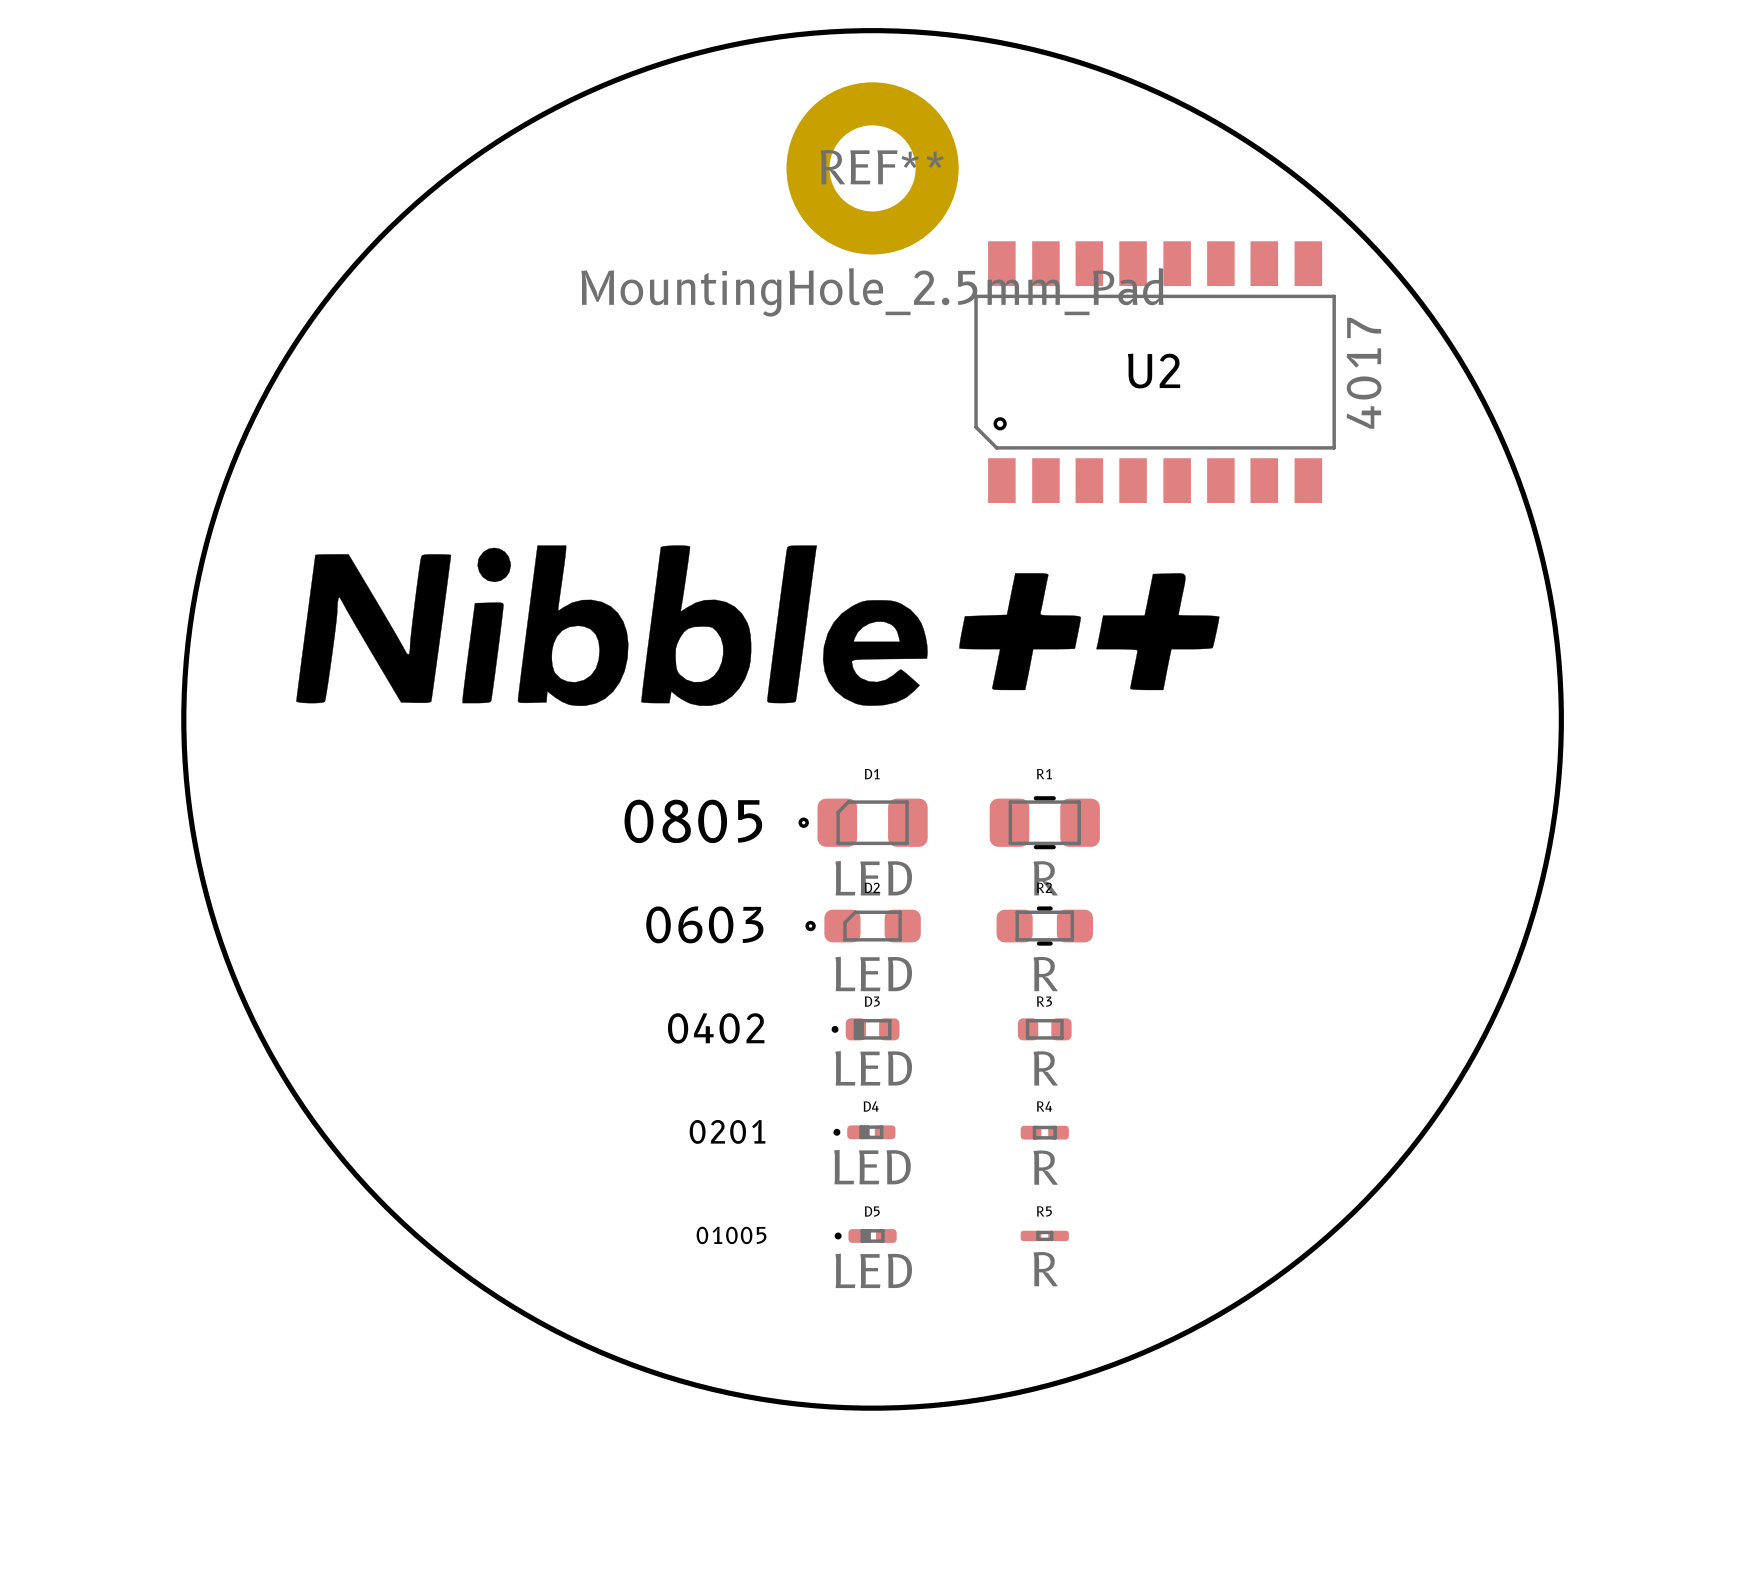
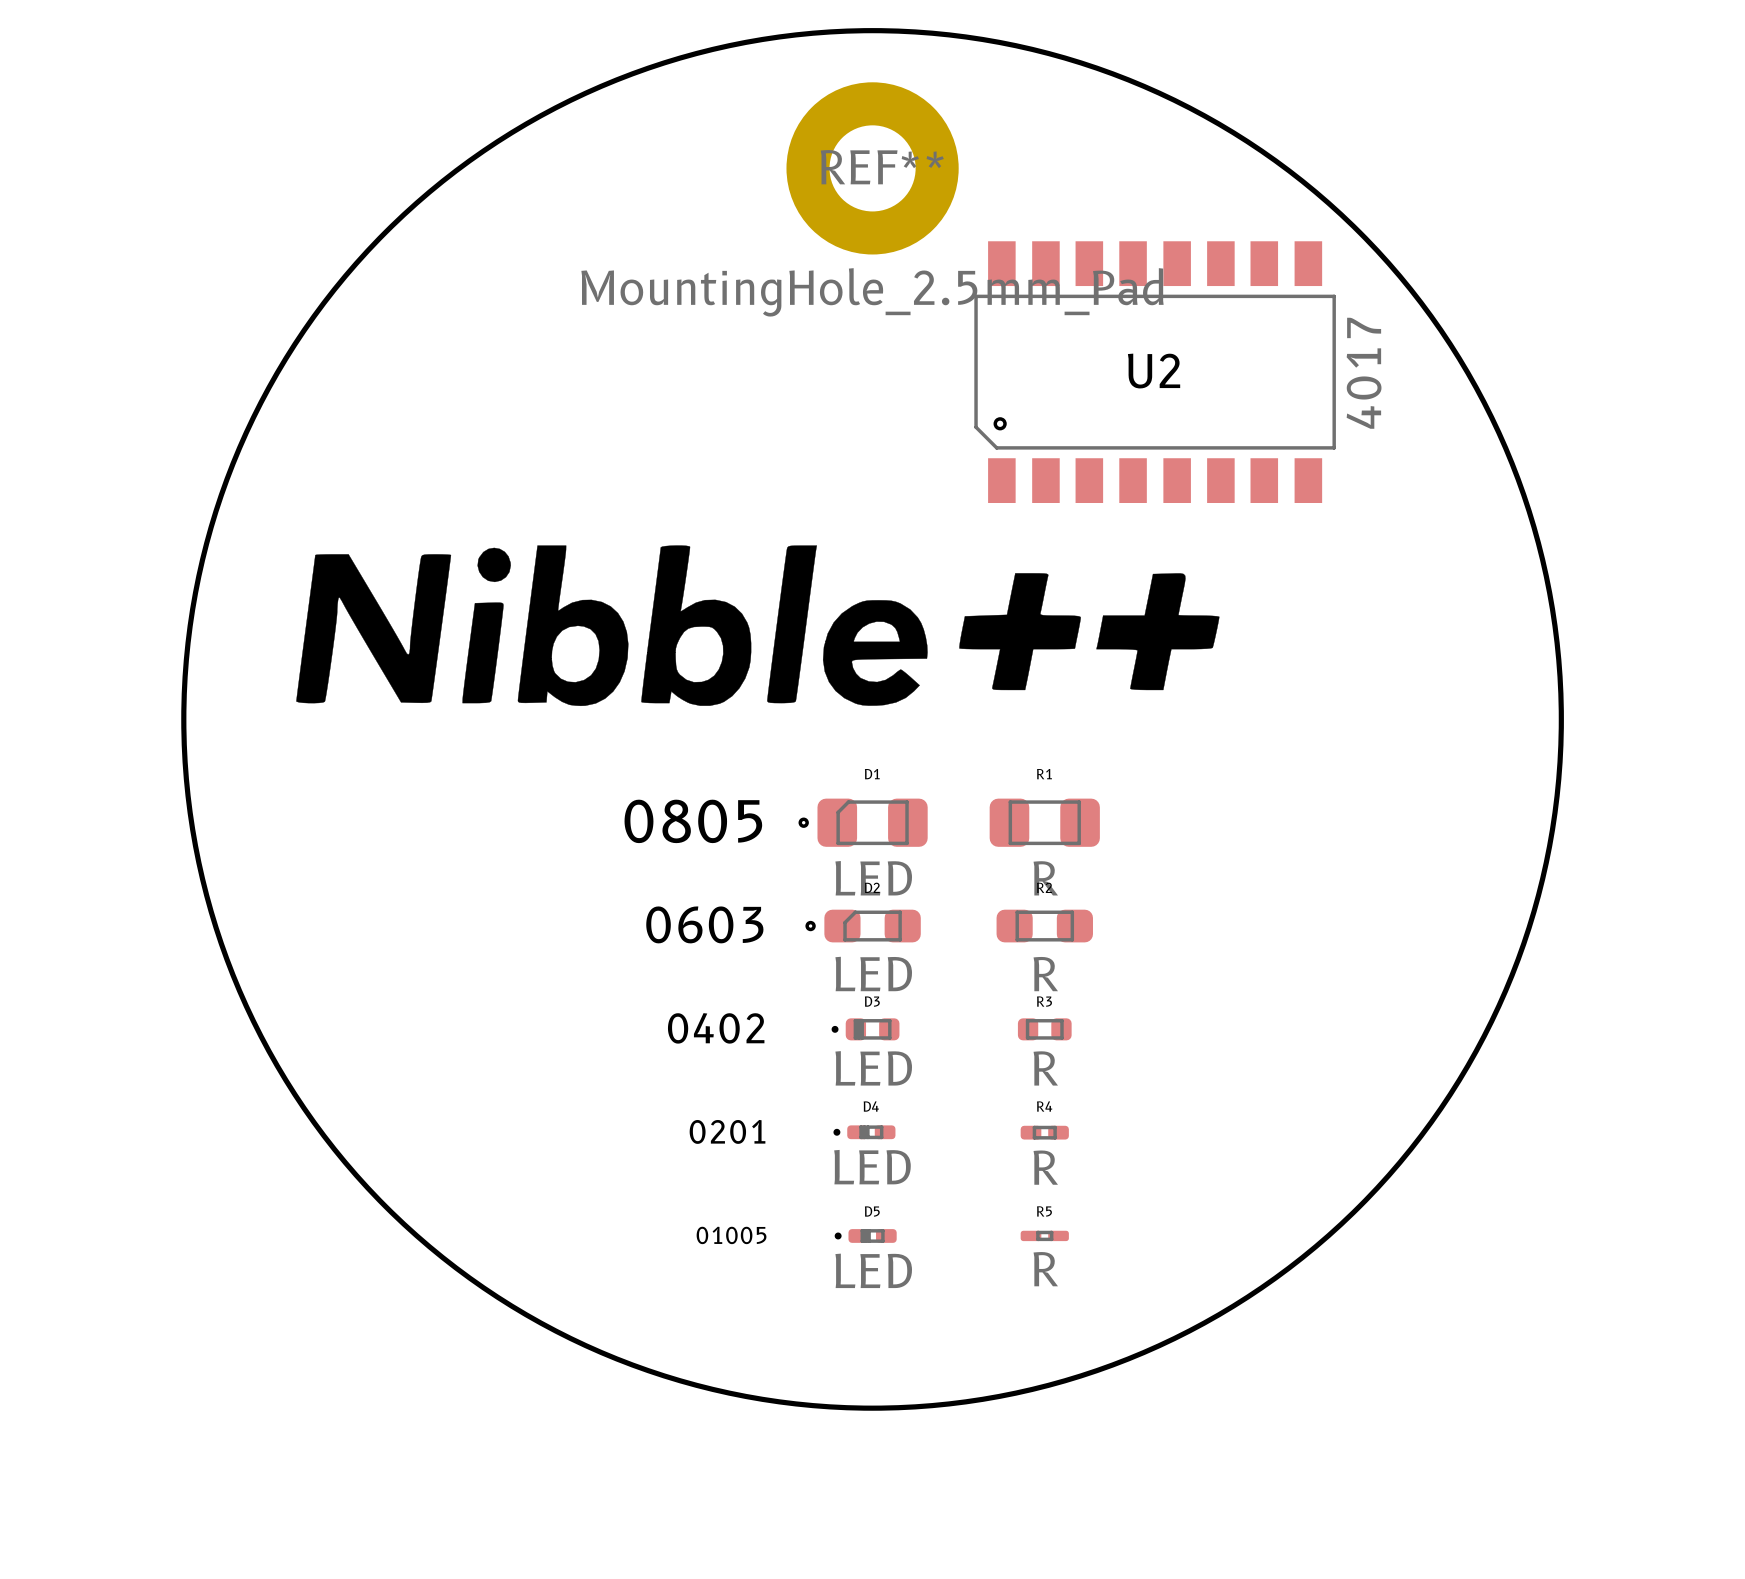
R1 footprint: [989, 796, 1100, 850] -> [989, 798, 1100, 847]
R2 footprint: [996, 906, 1093, 946] -> [996, 909, 1093, 943]

